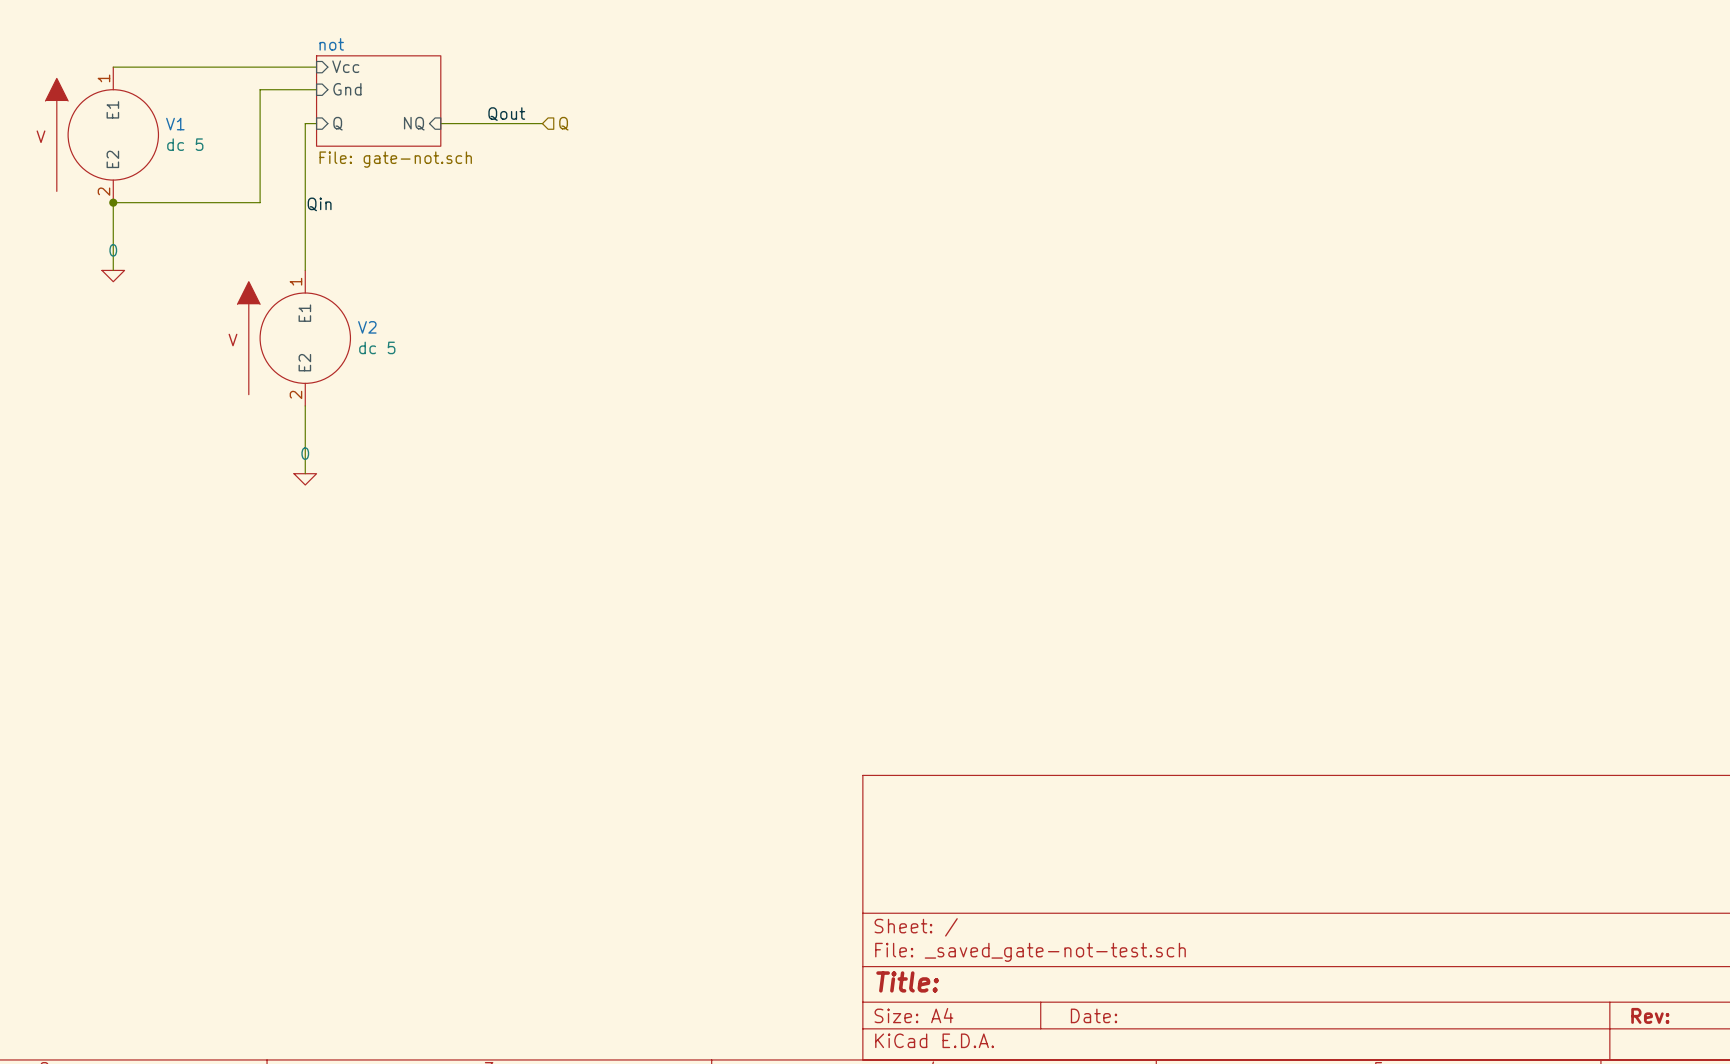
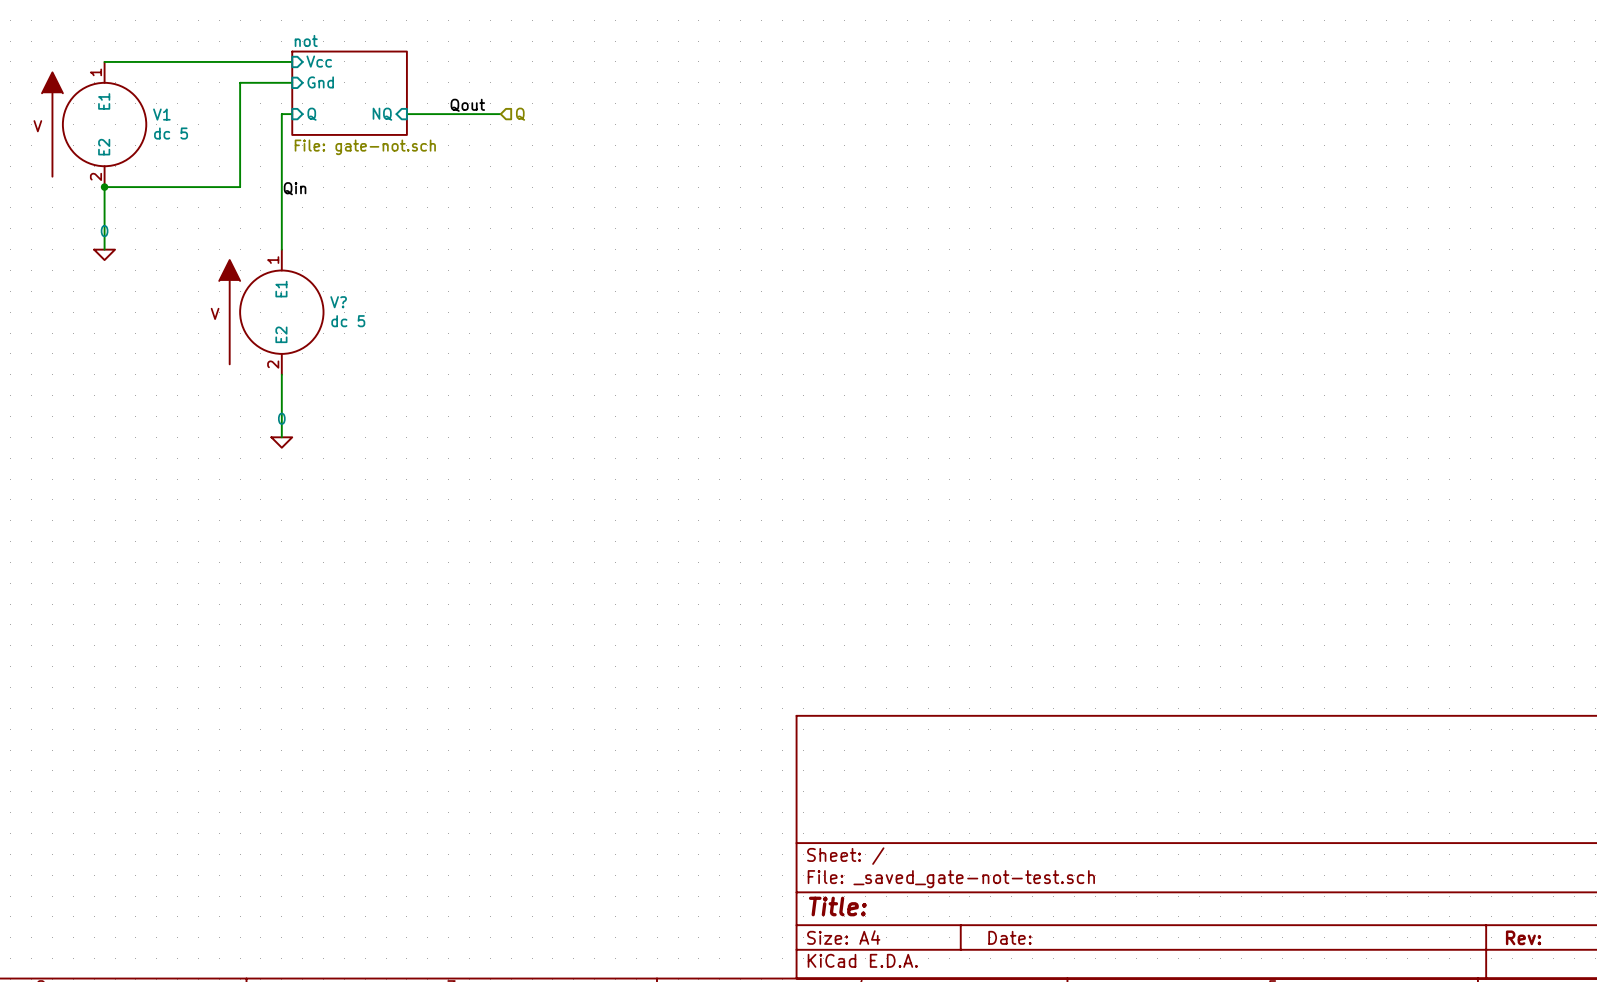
V2 name: V2 (367, 327) -> V? (338, 302)

